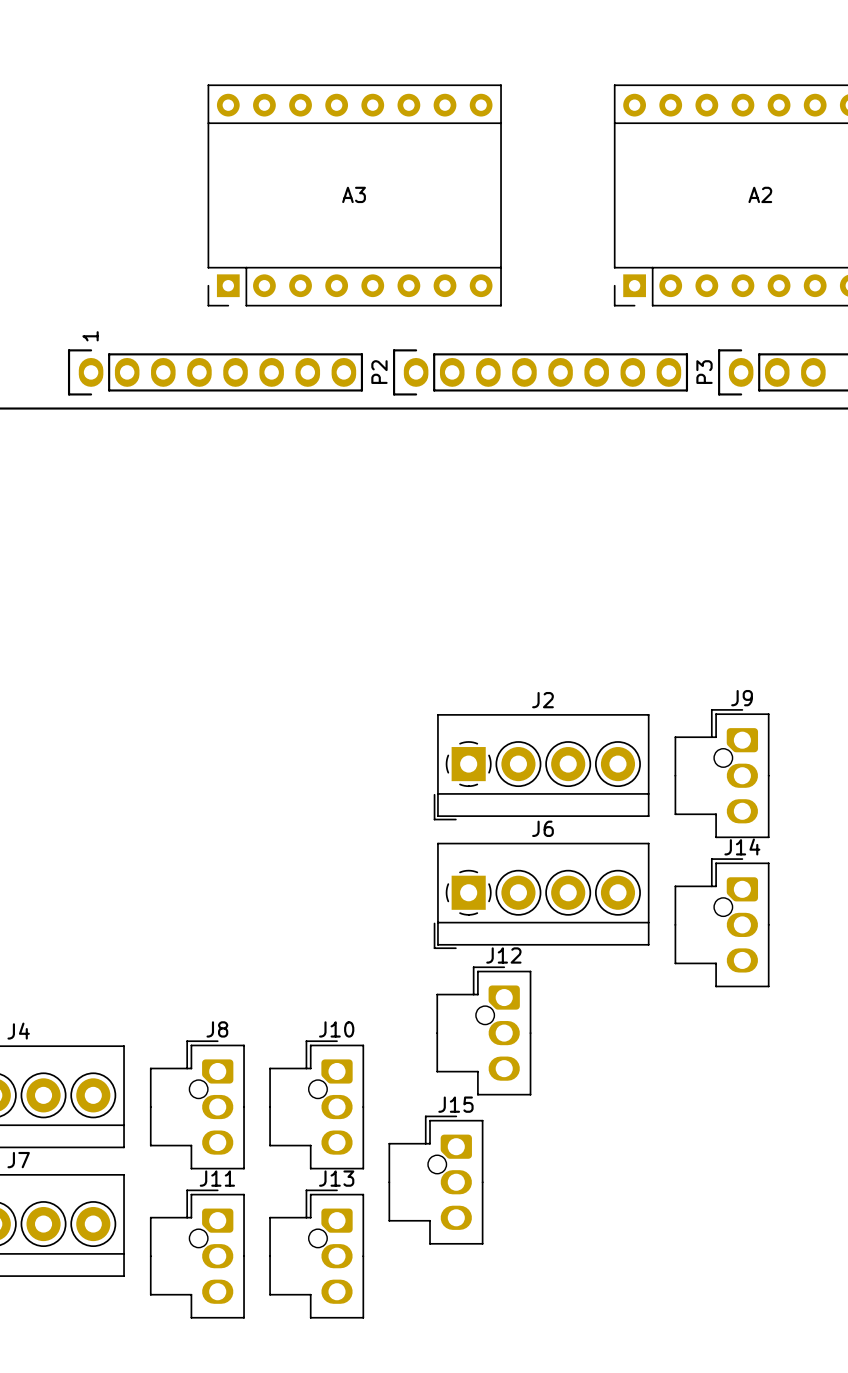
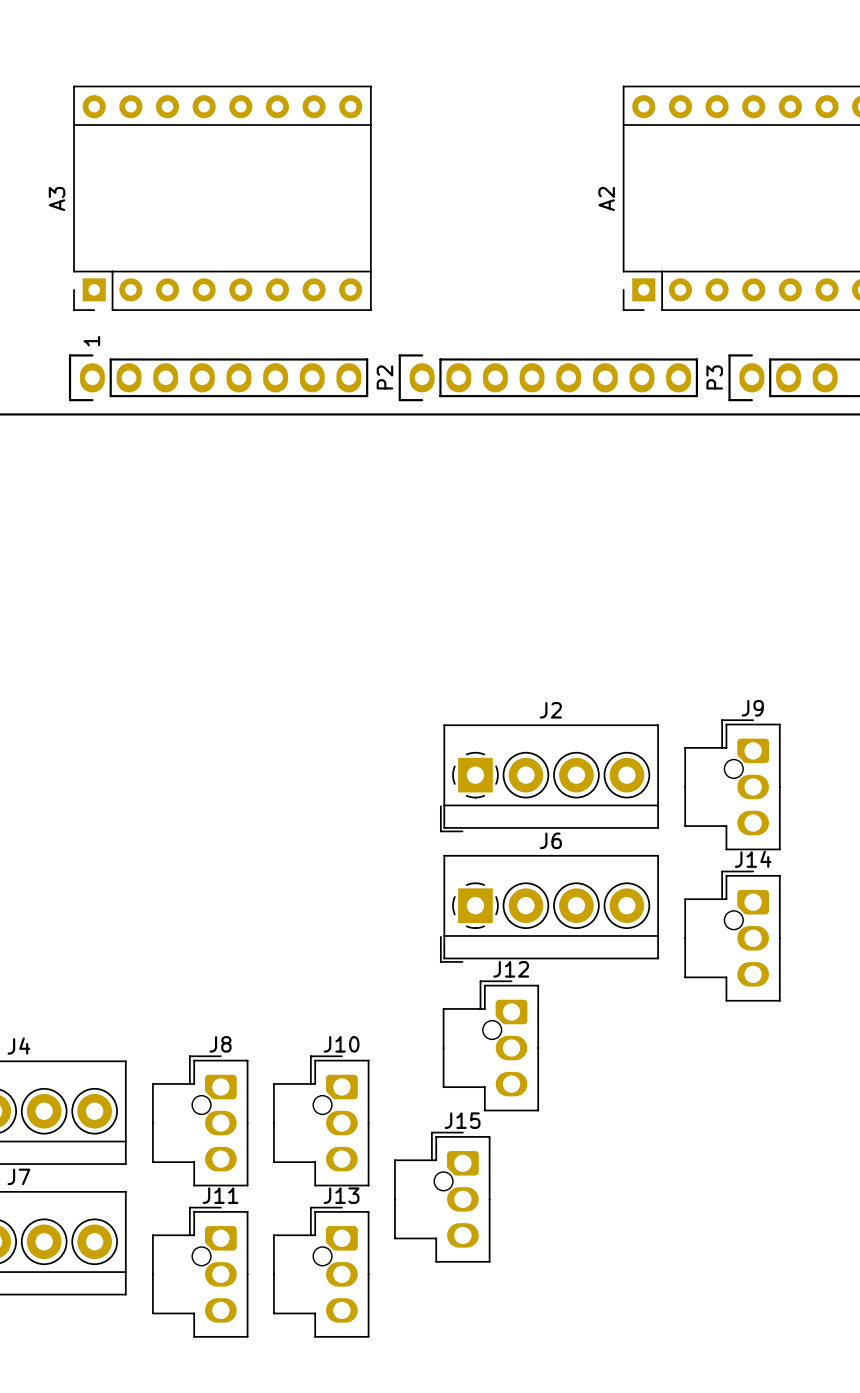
A3 name rotation: 0° (354, 194) -> 90° counterclockwise (57, 198)
A3 name position: A3 (354, 194) -> A3 (57, 198)
A2 name rotation: 0° (760, 194) -> 90° counterclockwise (606, 198)
A2 name position: A2 (760, 194) -> A2 (606, 198)
A3 position: (354, 195) -> (222, 198)

